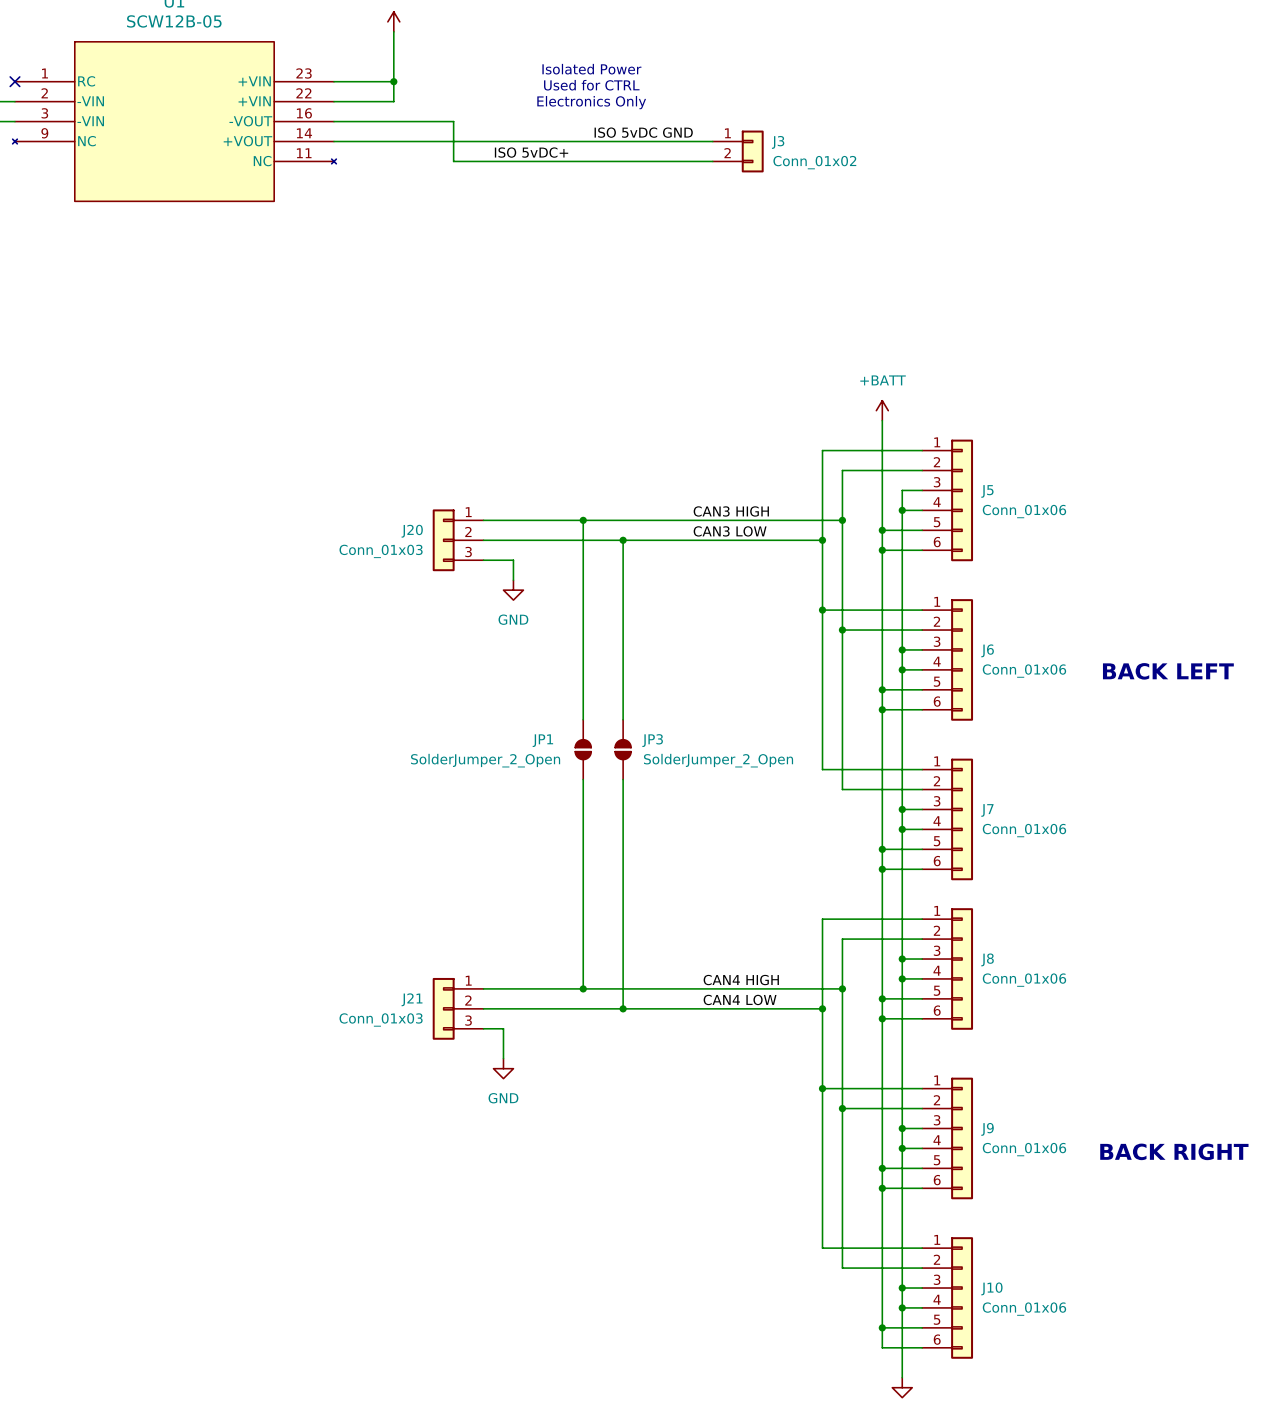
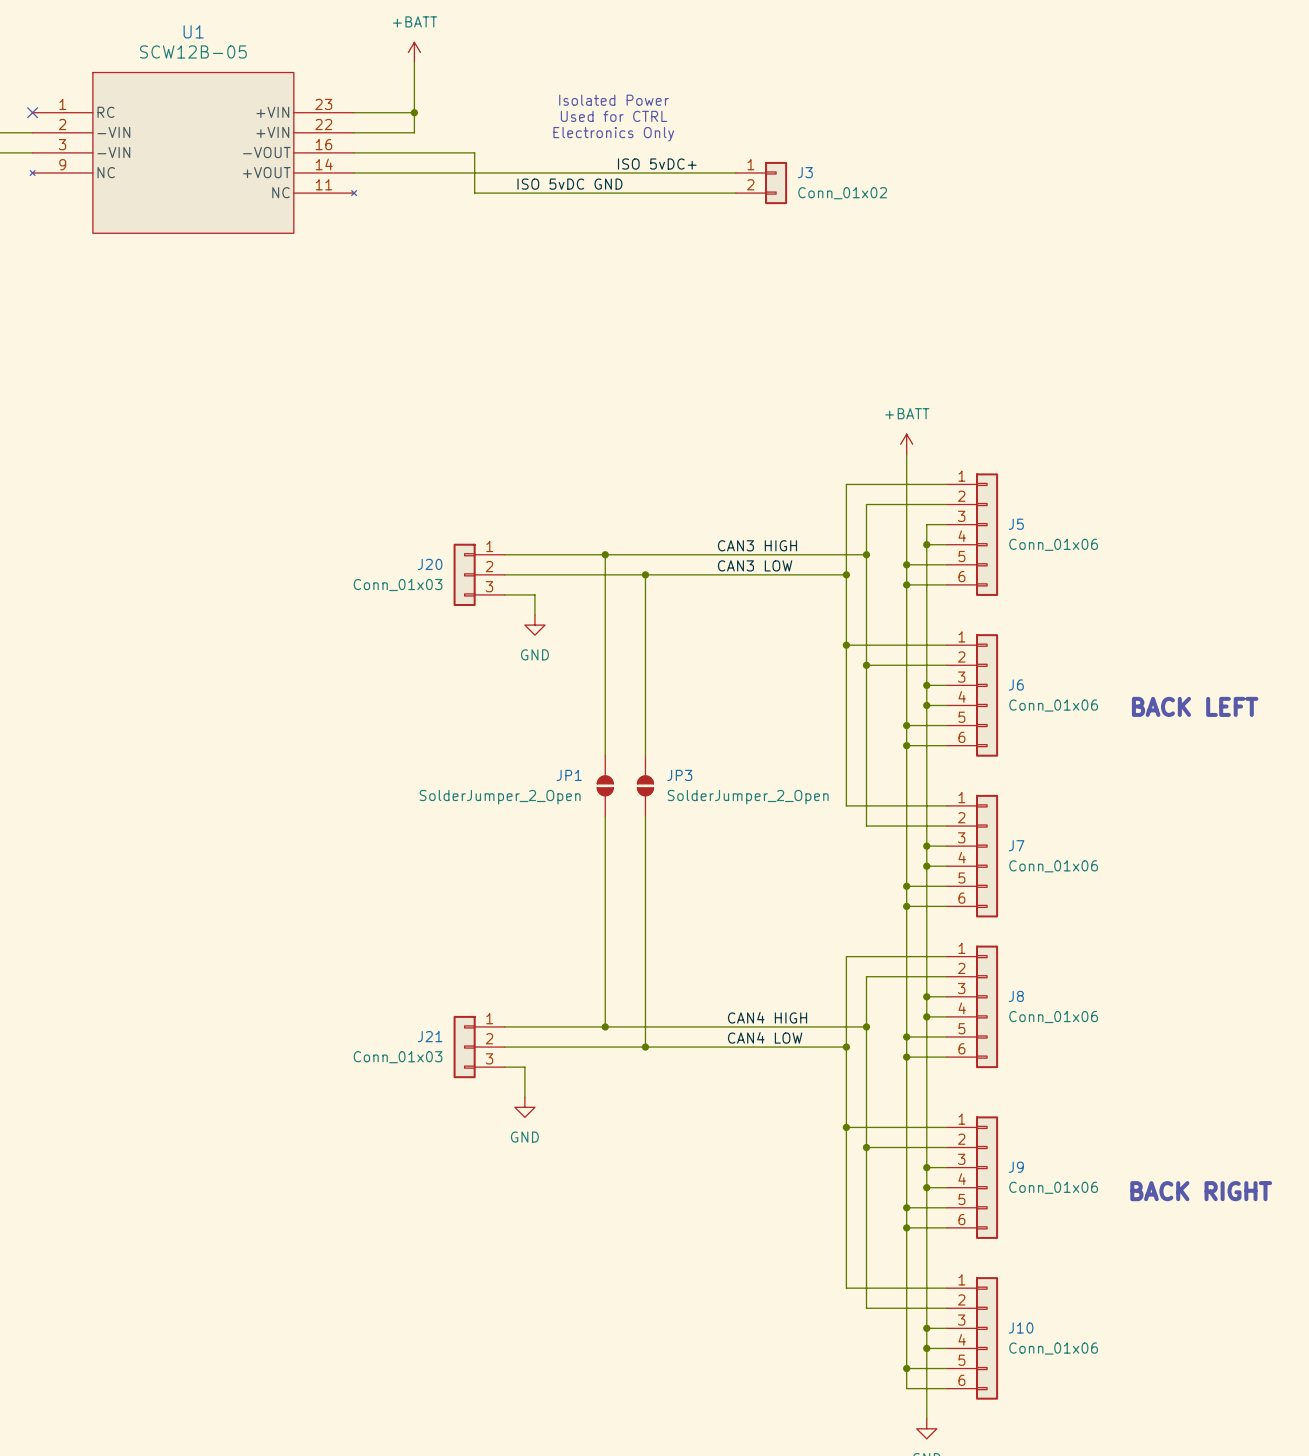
label: ISO 5vDC GND (643, 132) -> ISO 5vDC+ (657, 164)
label: ISO 5vDC+ (531, 152) -> ISO 5vDC GND (569, 184)

